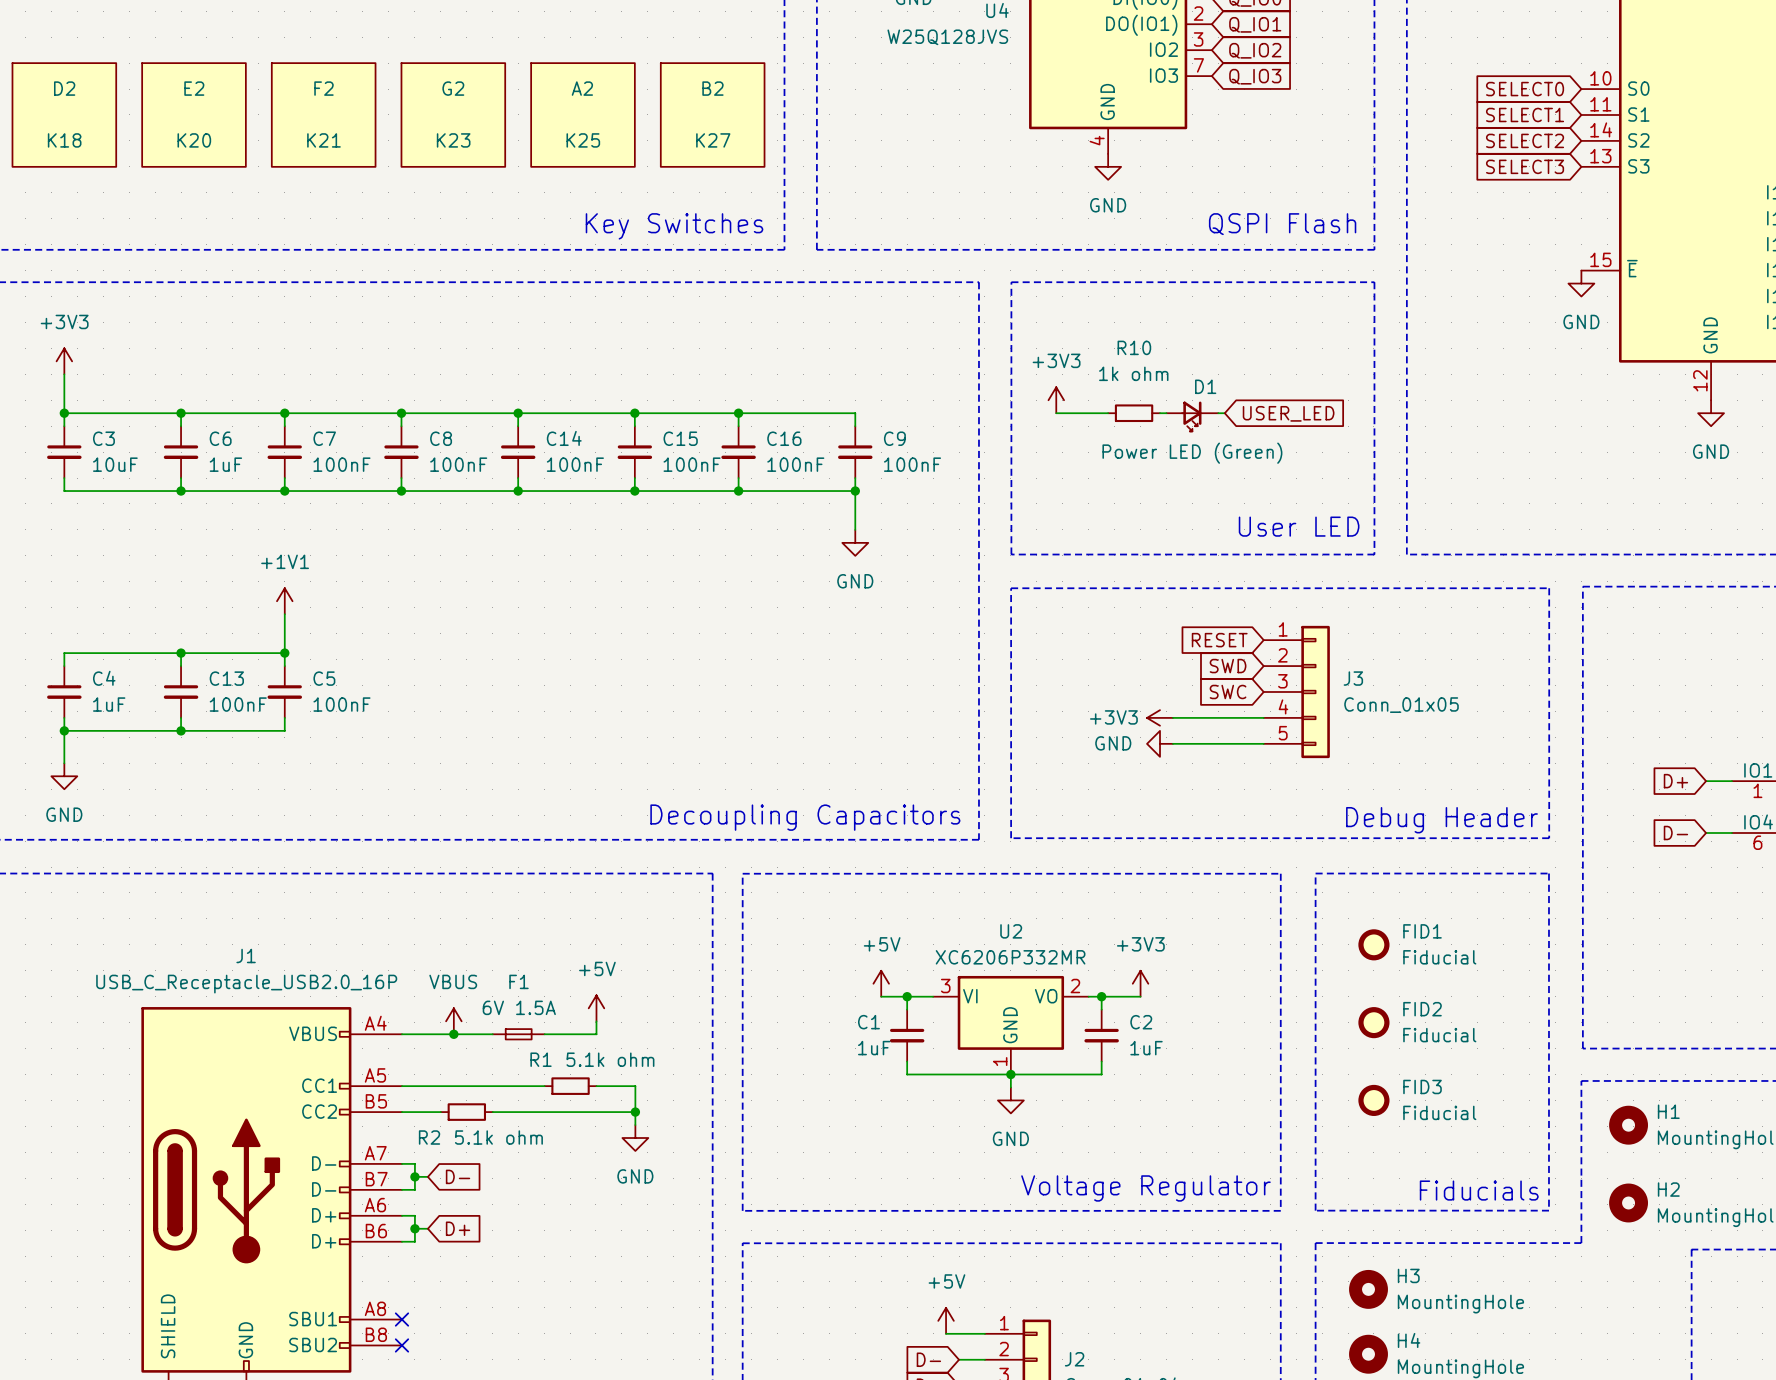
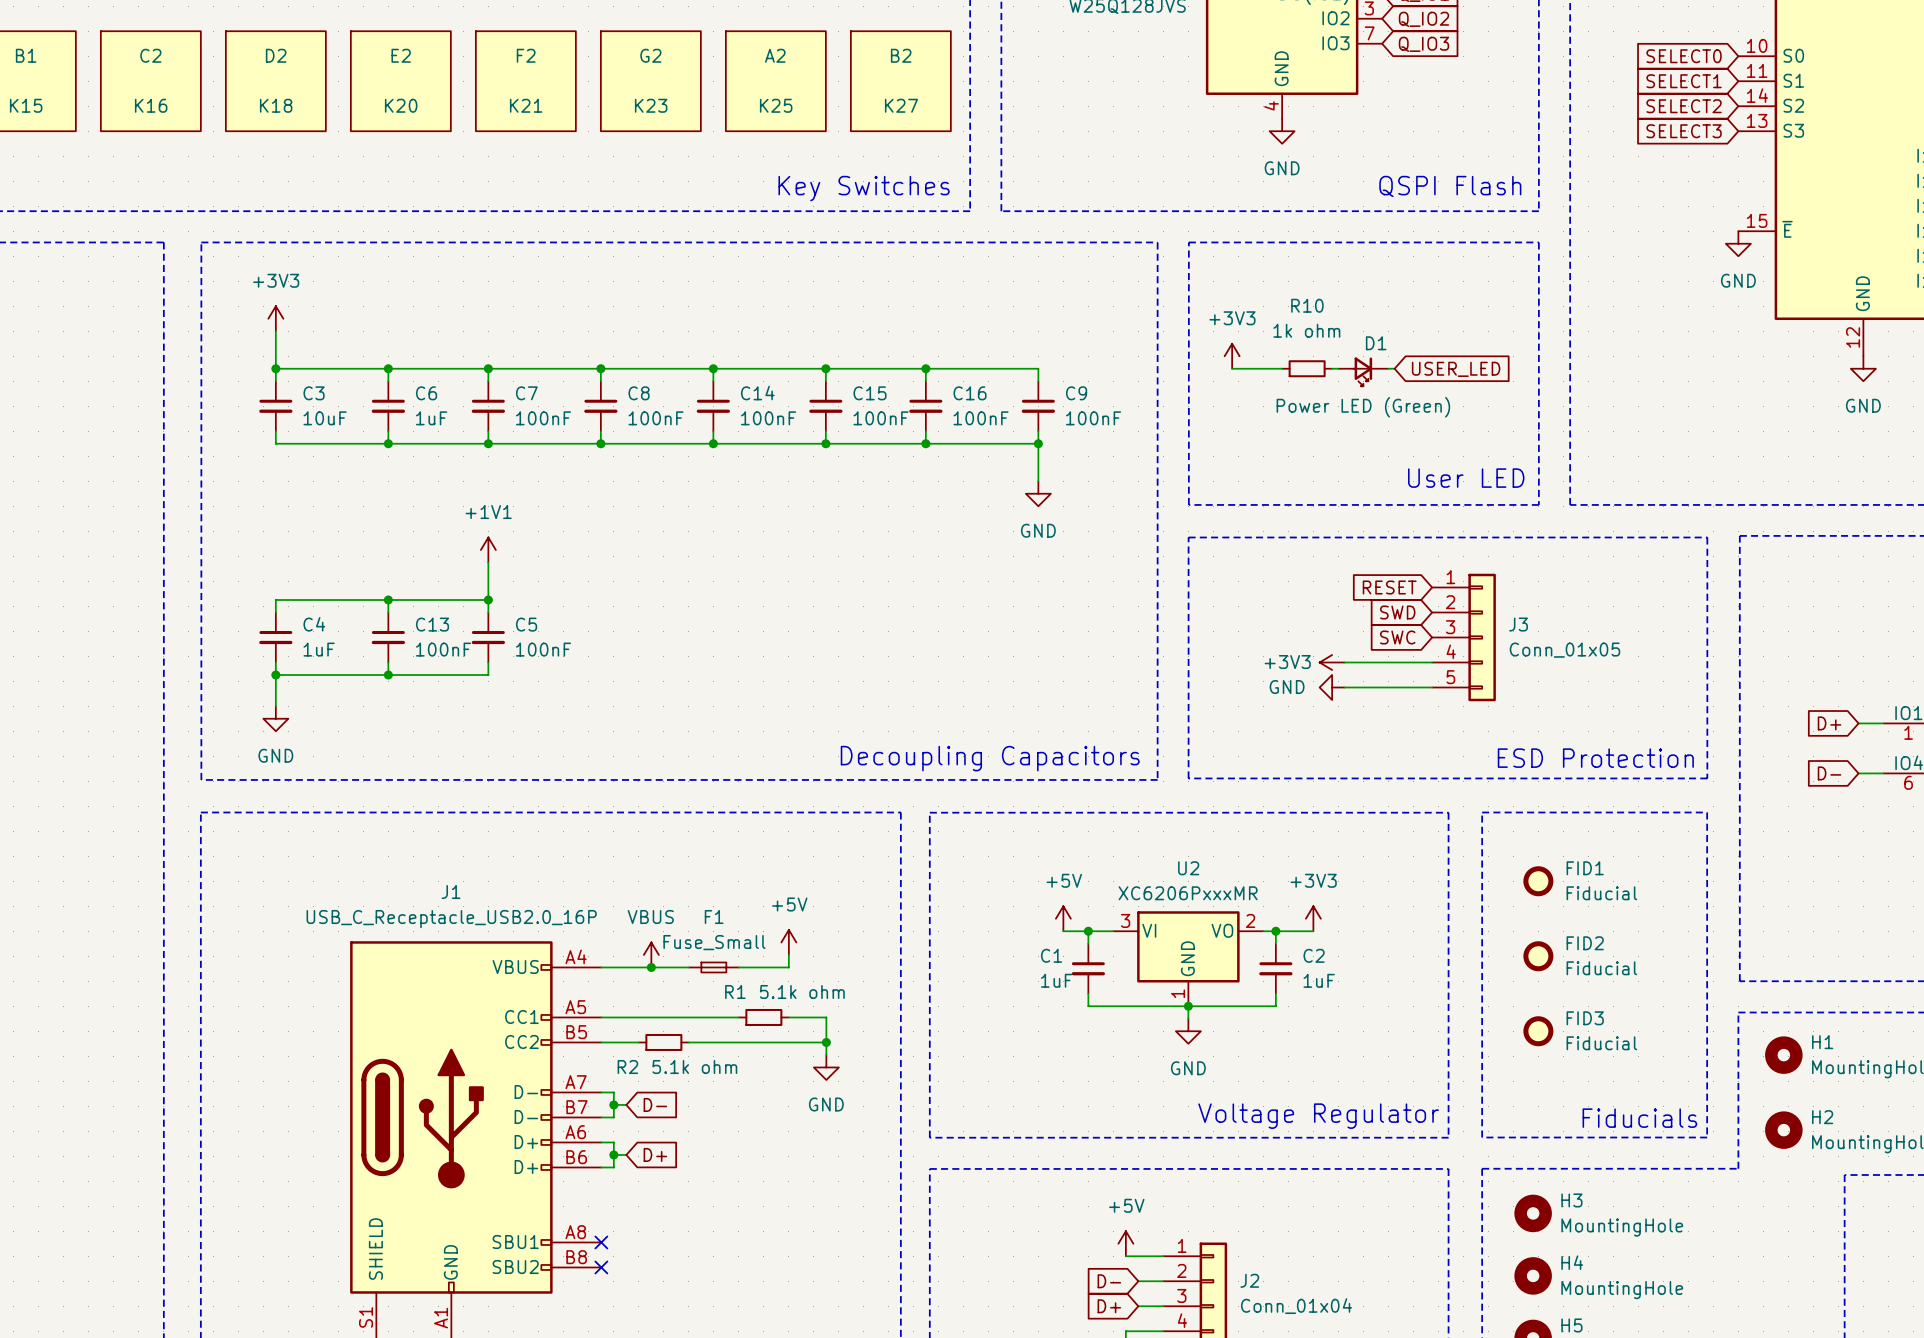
text: Debug Header (1441, 820) -> ESD Protection (1595, 758)
U2 value: XC6206P332MR (1010, 957) -> XC6206PxxxMR (1188, 893)
F1 value: 6V 1.5A (519, 1007) -> Fuse_Small (714, 942)

